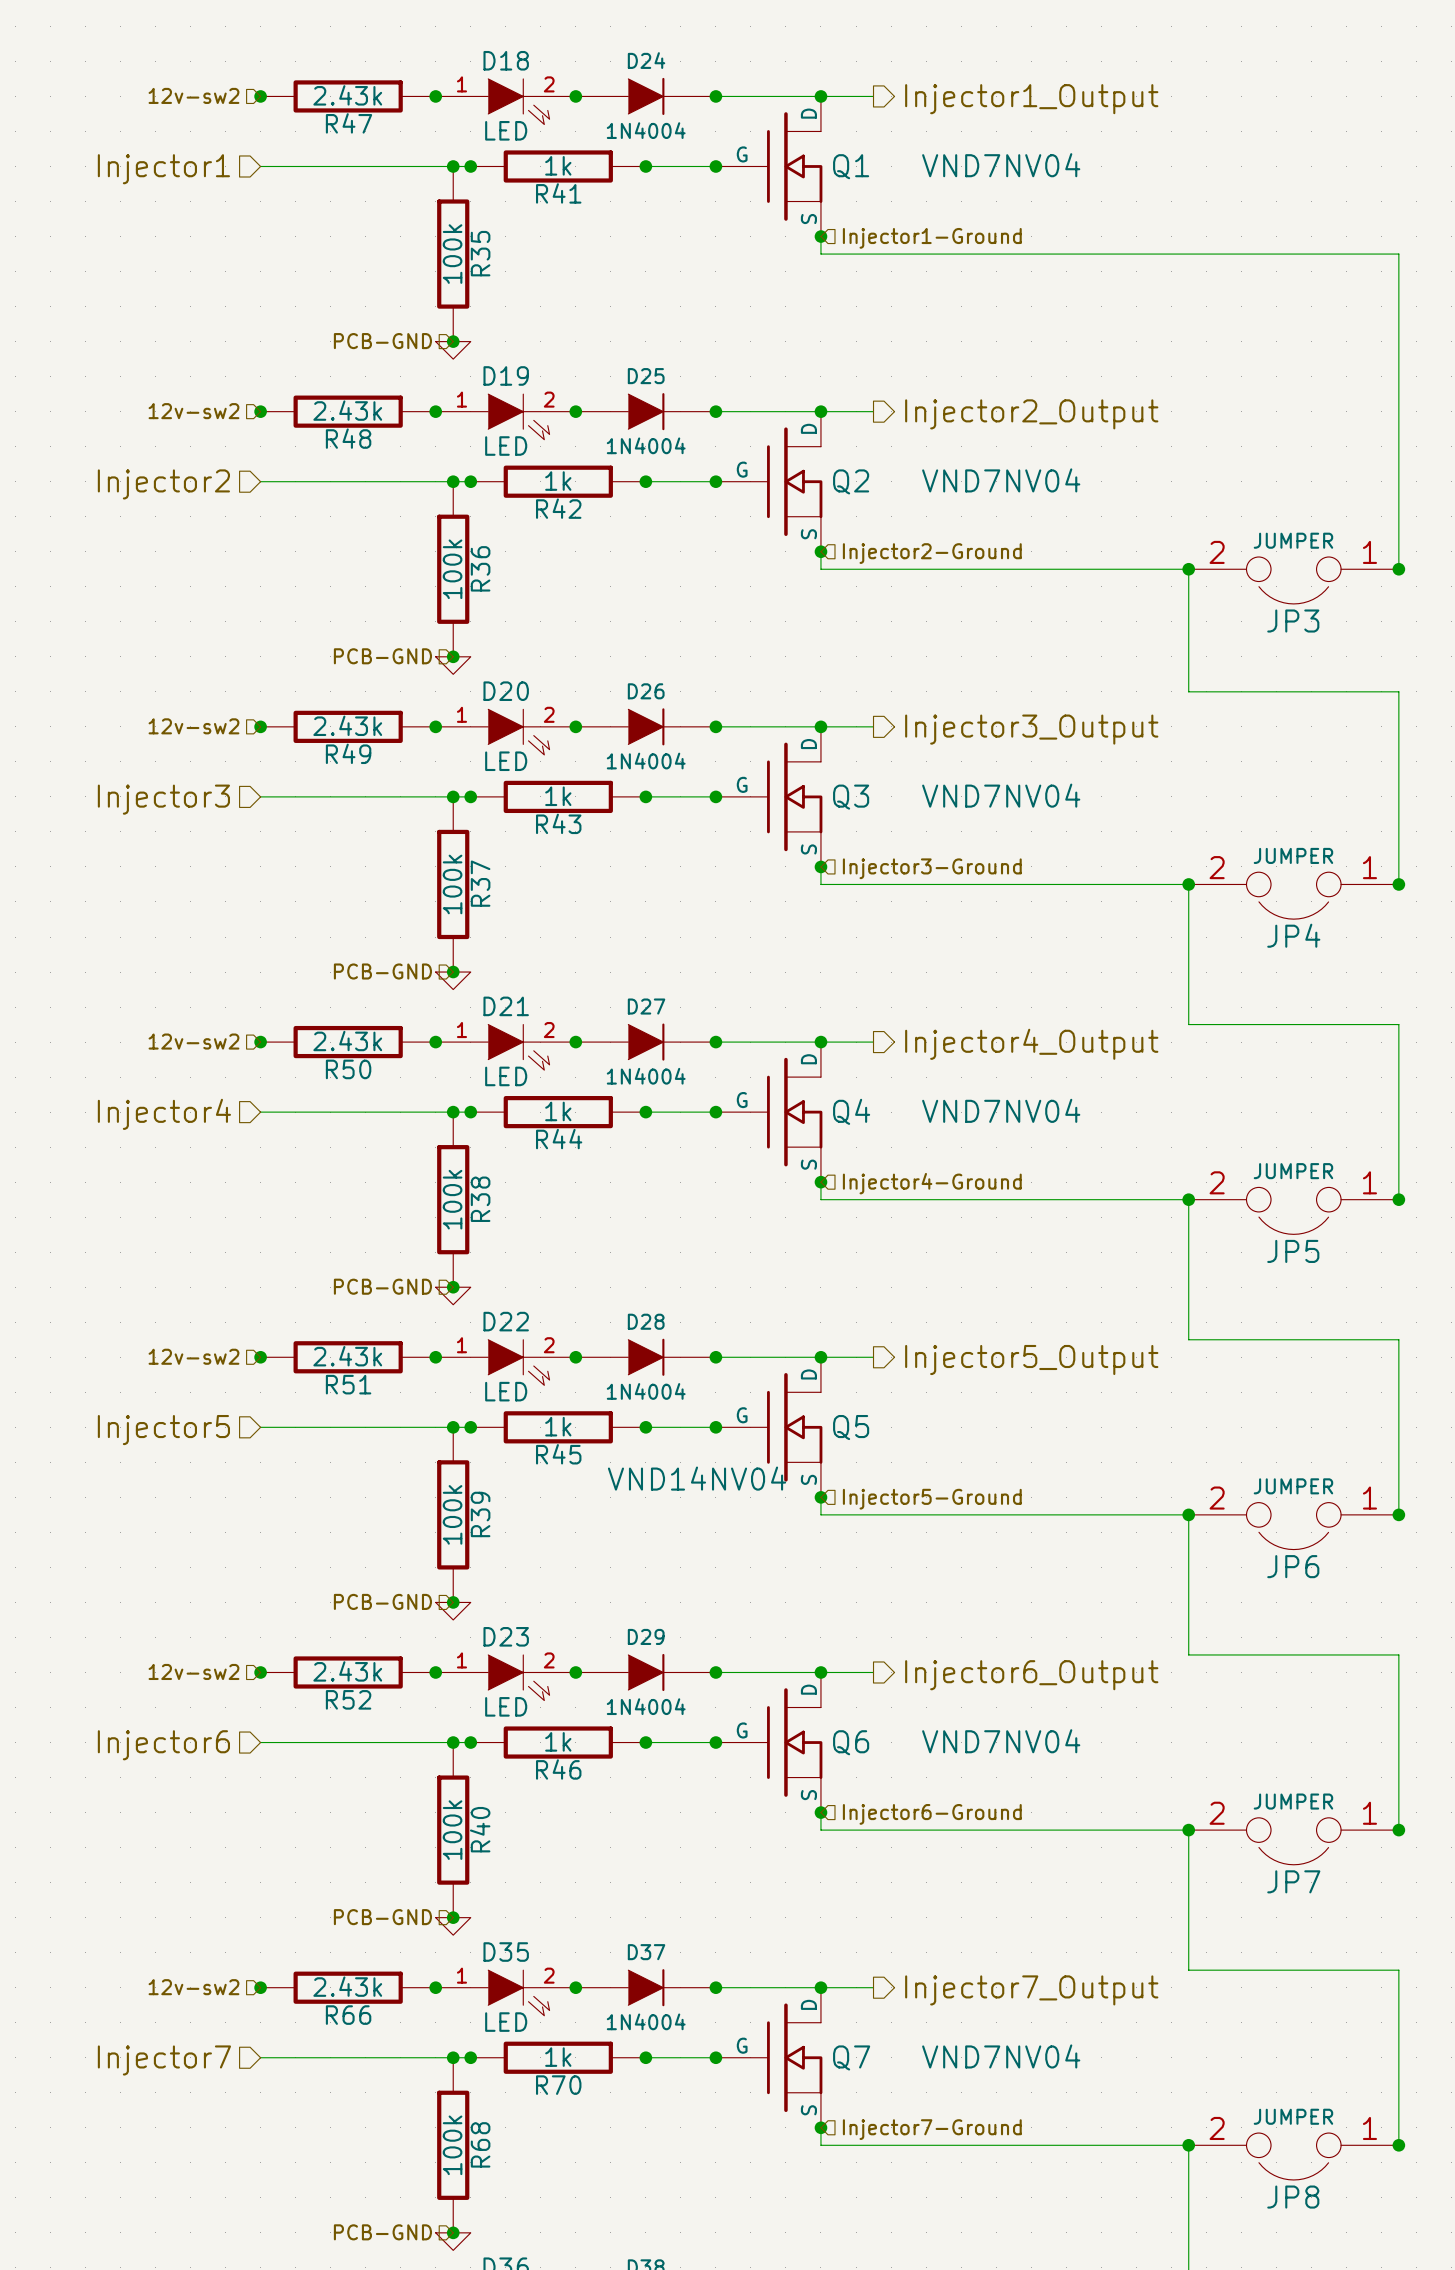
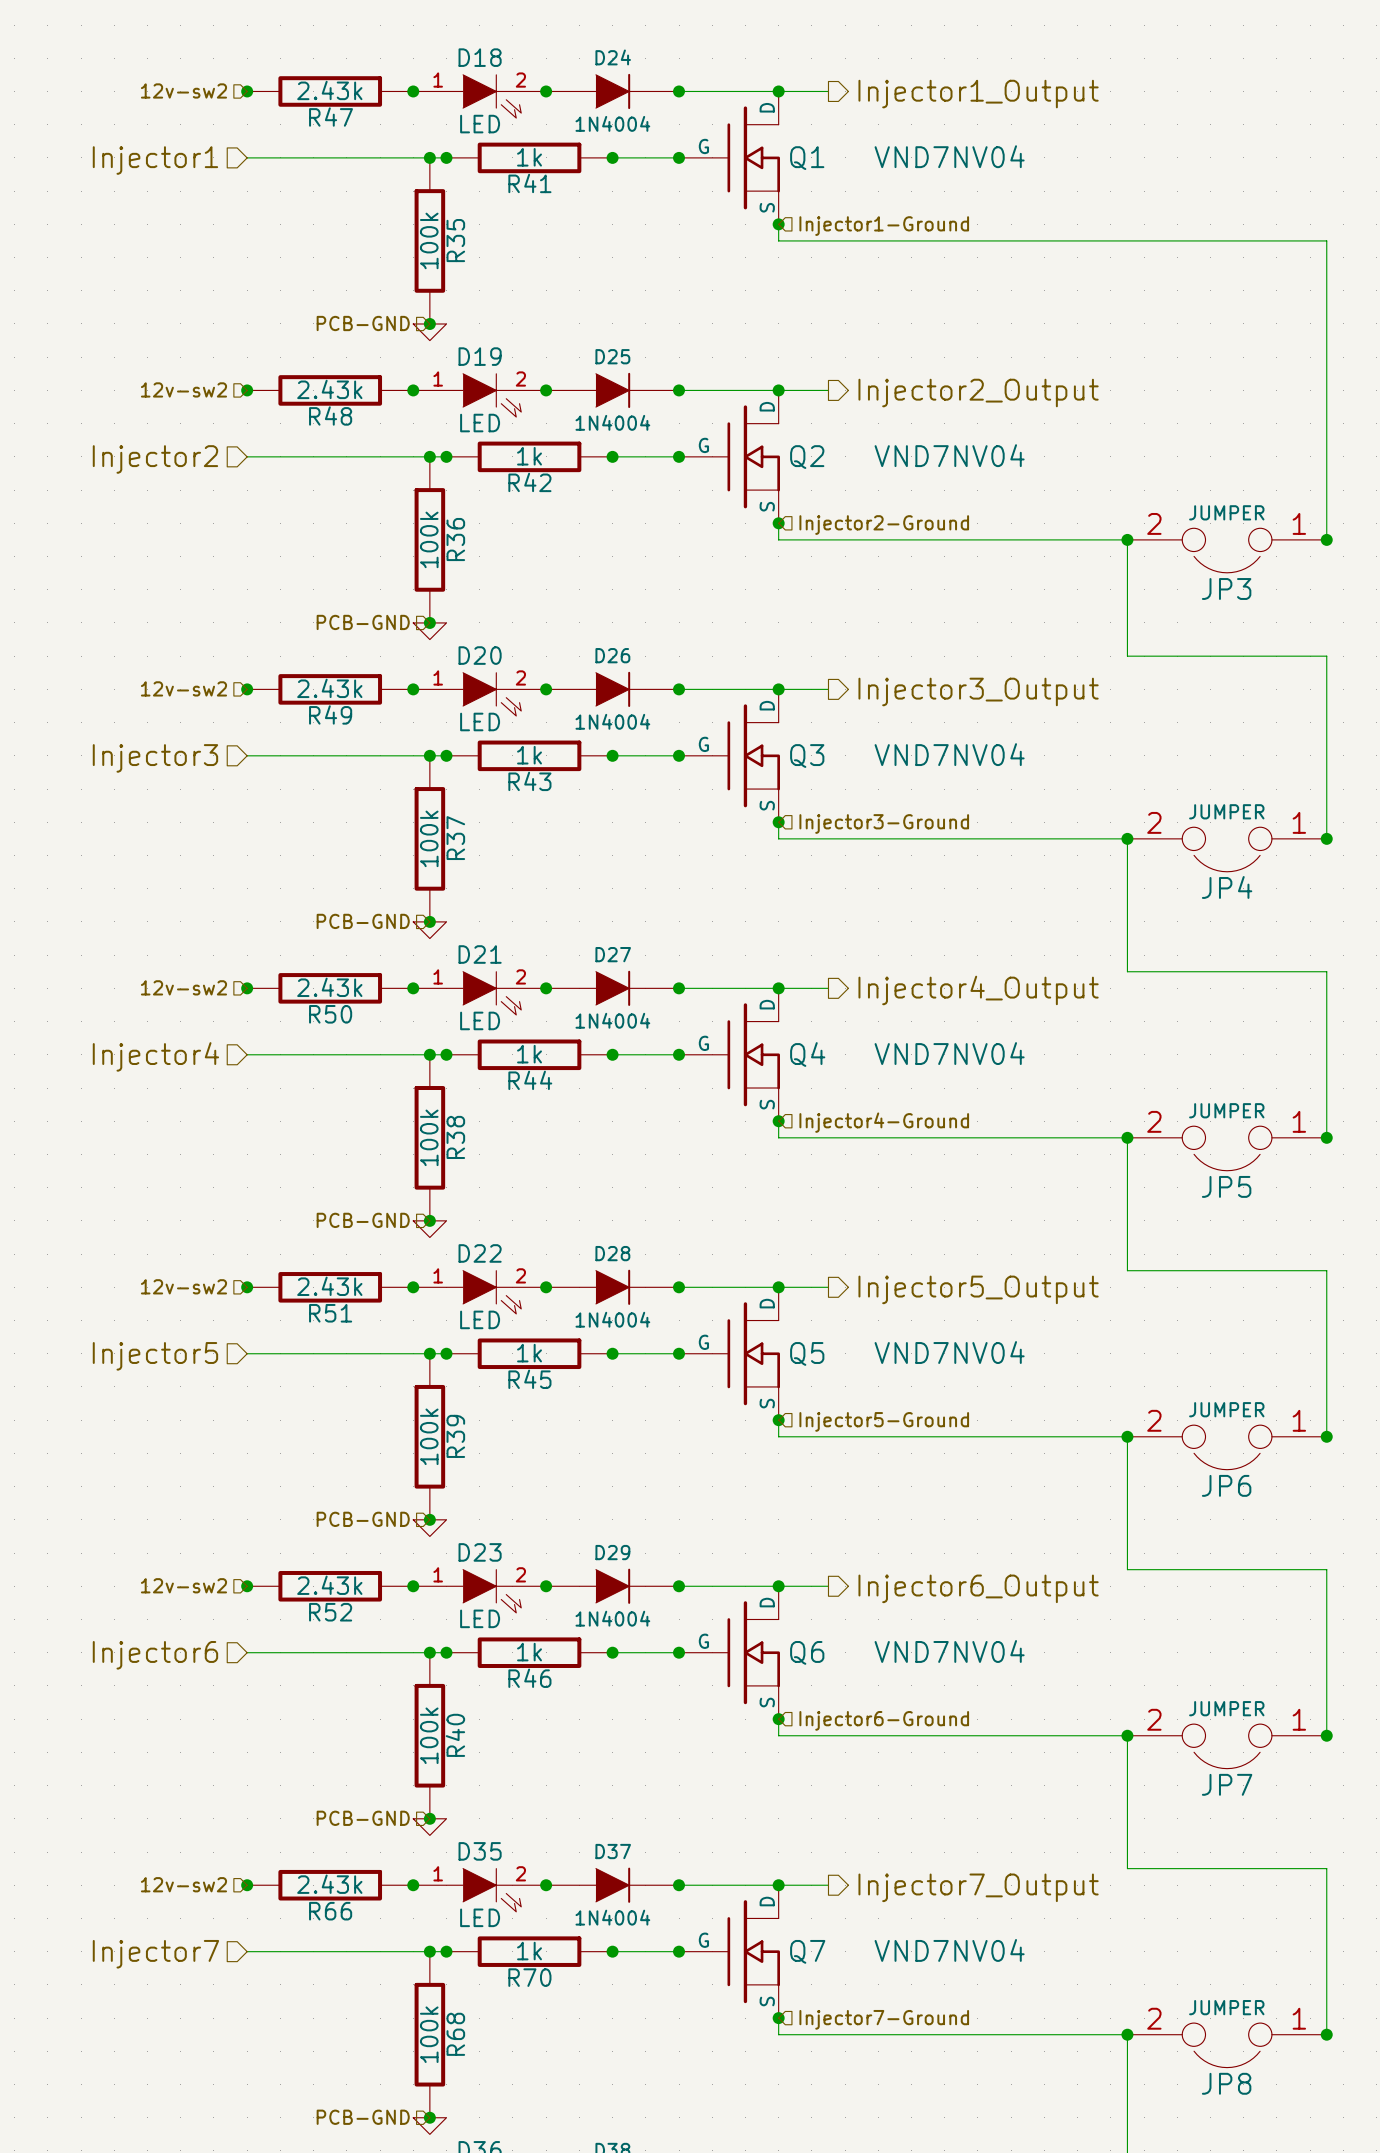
Q5 value: VND14NV04 (697, 1478) -> VND7NV04 (949, 1352)

